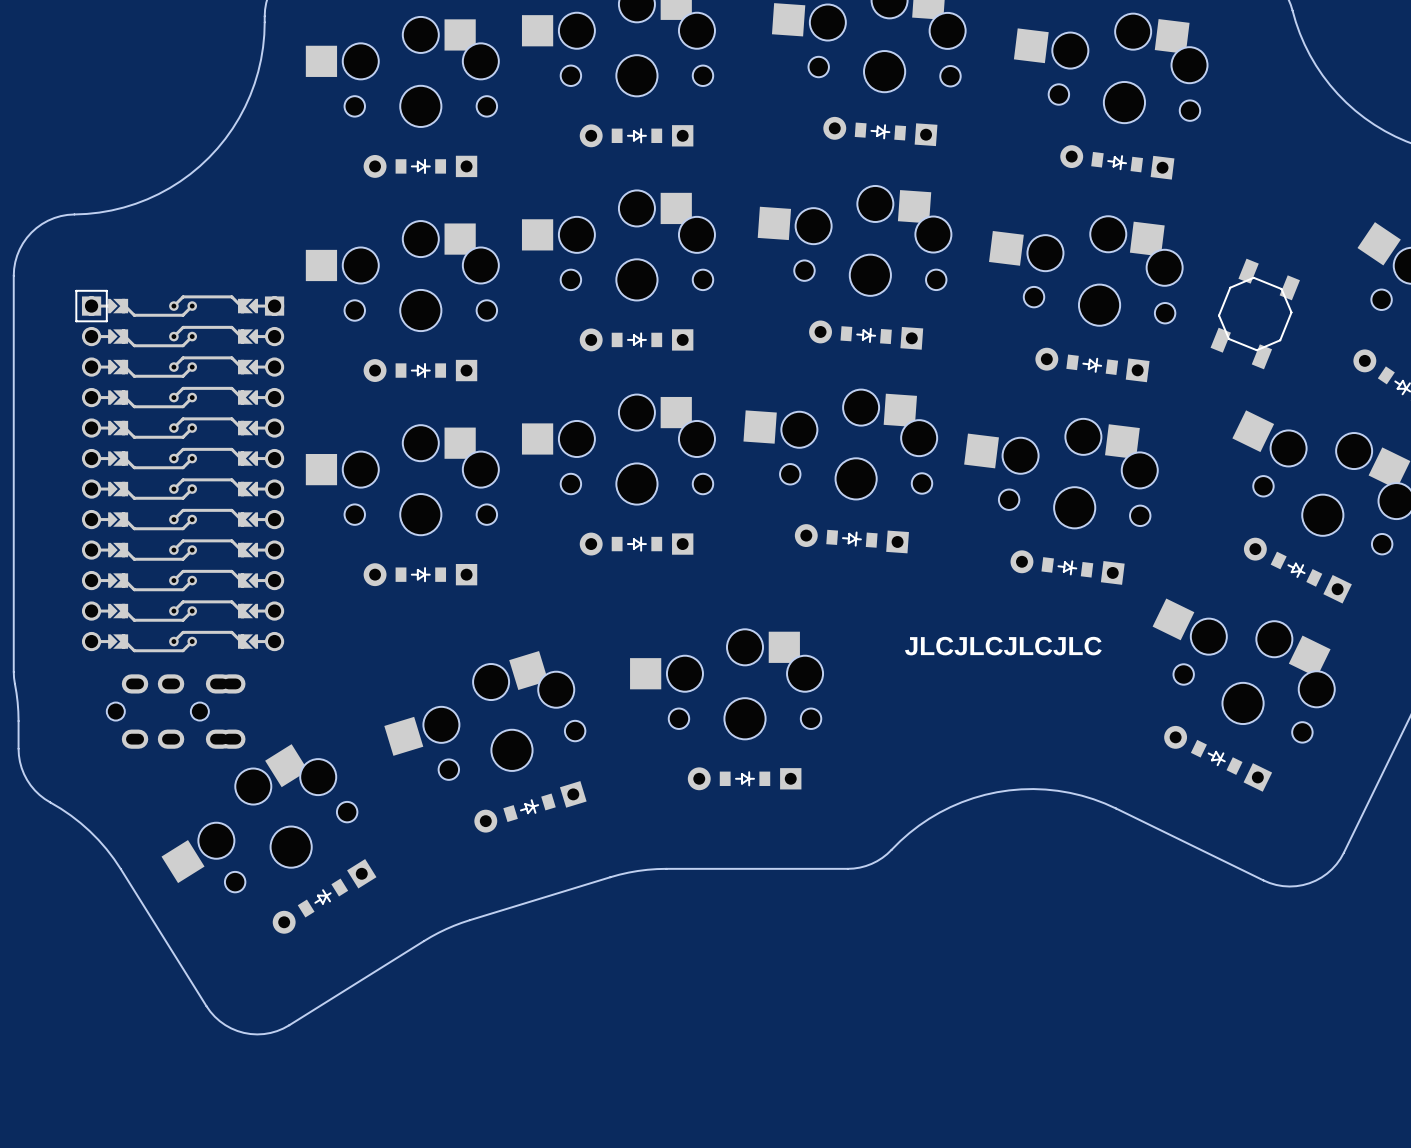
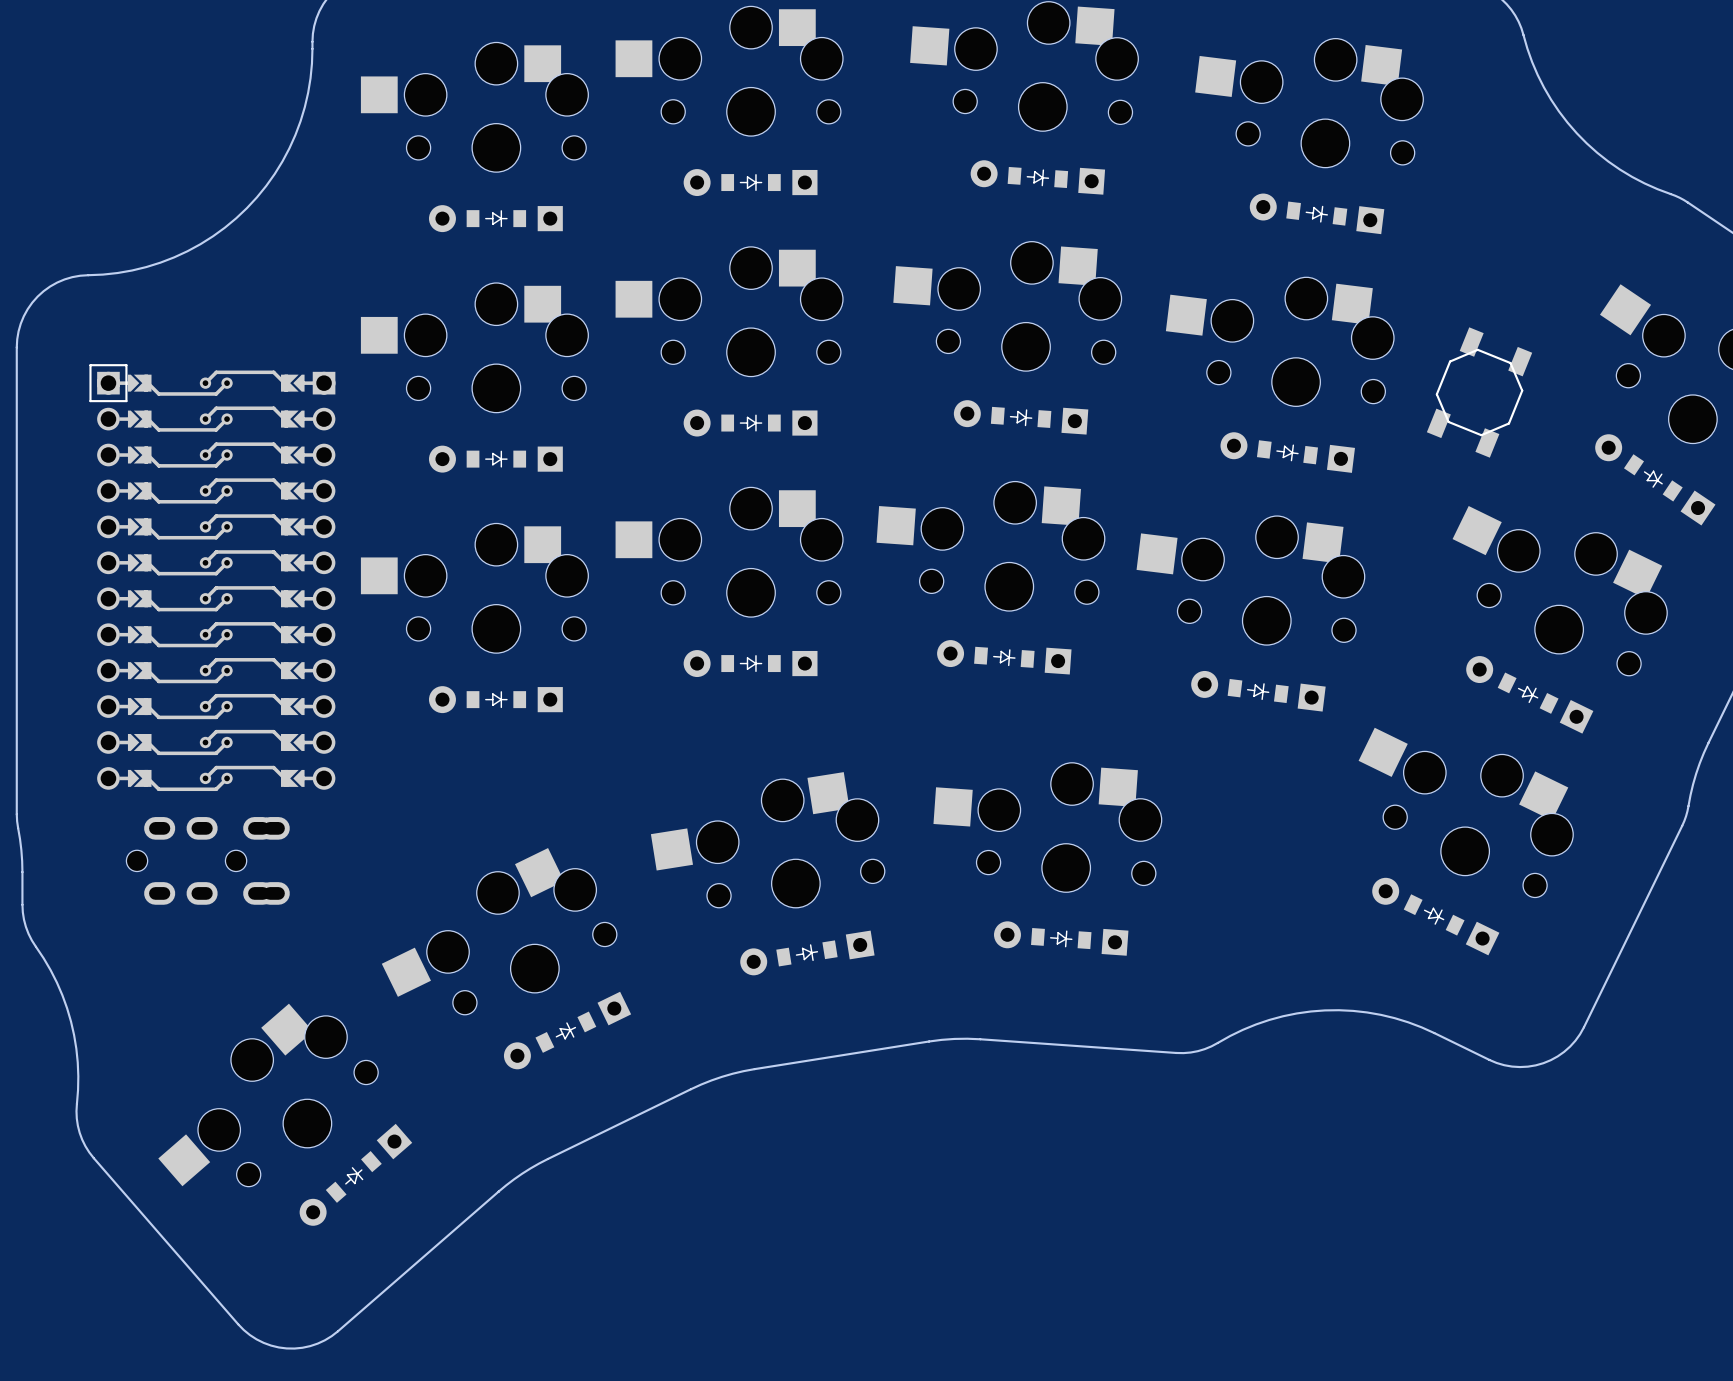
text: JLCJLCJLCJLC (1003, 646) -> none
part: none -> (1047, 827)
part: (726, 684) -> none
part: none -> (767, 839)
part: (484, 715) -> none
board edge: (18, 748) (24, 774) (34, 790) (89, 831) (106, 849) (120, 869) -> (22, 904) (23, 919) (28, 933) (56, 982) (71, 1021) (77, 1062) (76, 1118) (79, 1132) (85, 1146) (238, 1324) (256, 1339) (278, 1347) (294, 1348) (310, 1346) (331, 1336) (498, 1191)
part: none -> (499, 931)
part: none -> (1061, 938)
part: (744, 778) -> none
part: none -> (807, 952)
part: (530, 806) -> none
part: (259, 818) -> none
part: none -> (567, 1030)
board edge: (1216, 857) (1116, 808) (1081, 795) (1057, 790) (1033, 789) (997, 792) (961, 802) (939, 812) (909, 833) (882, 857) (859, 867) (666, 868) (638, 870) (610, 877) (469, 920) (431, 936) (283, 1028) (270, 1032) (257, 1034) (243, 1032) (231, 1028) (219, 1021) (210, 1011) (120, 869) -> (1434, 1033) (1408, 1022) (1381, 1014) (1353, 1010) (1324, 1010) (1296, 1013) (1269, 1019) (1242, 1029) (1211, 1046) (1190, 1052) (954, 1038) (754, 1069) (722, 1076) (690, 1089) (539, 1163) (498, 1191)
part: (324, 896) -> none
part: none -> (268, 1095)
part: none -> (355, 1174)

